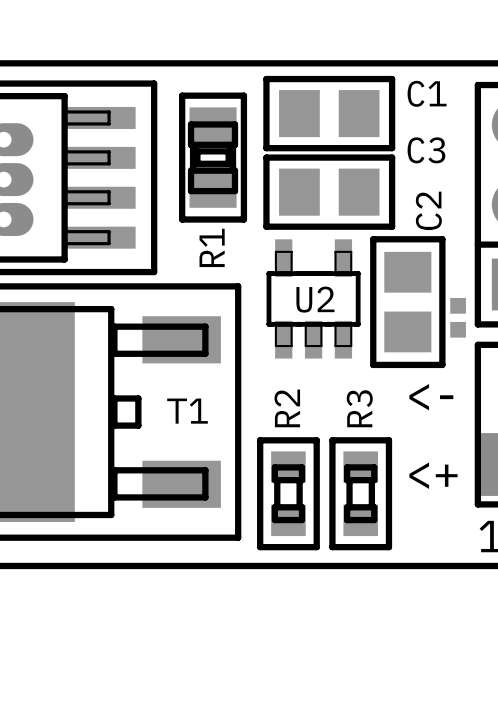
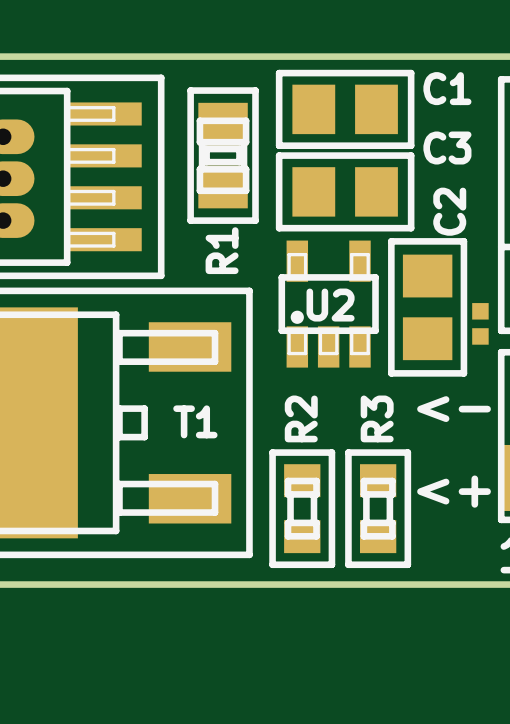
U2 footprint: [266, 239, 361, 359] -> [278, 240, 379, 368]

